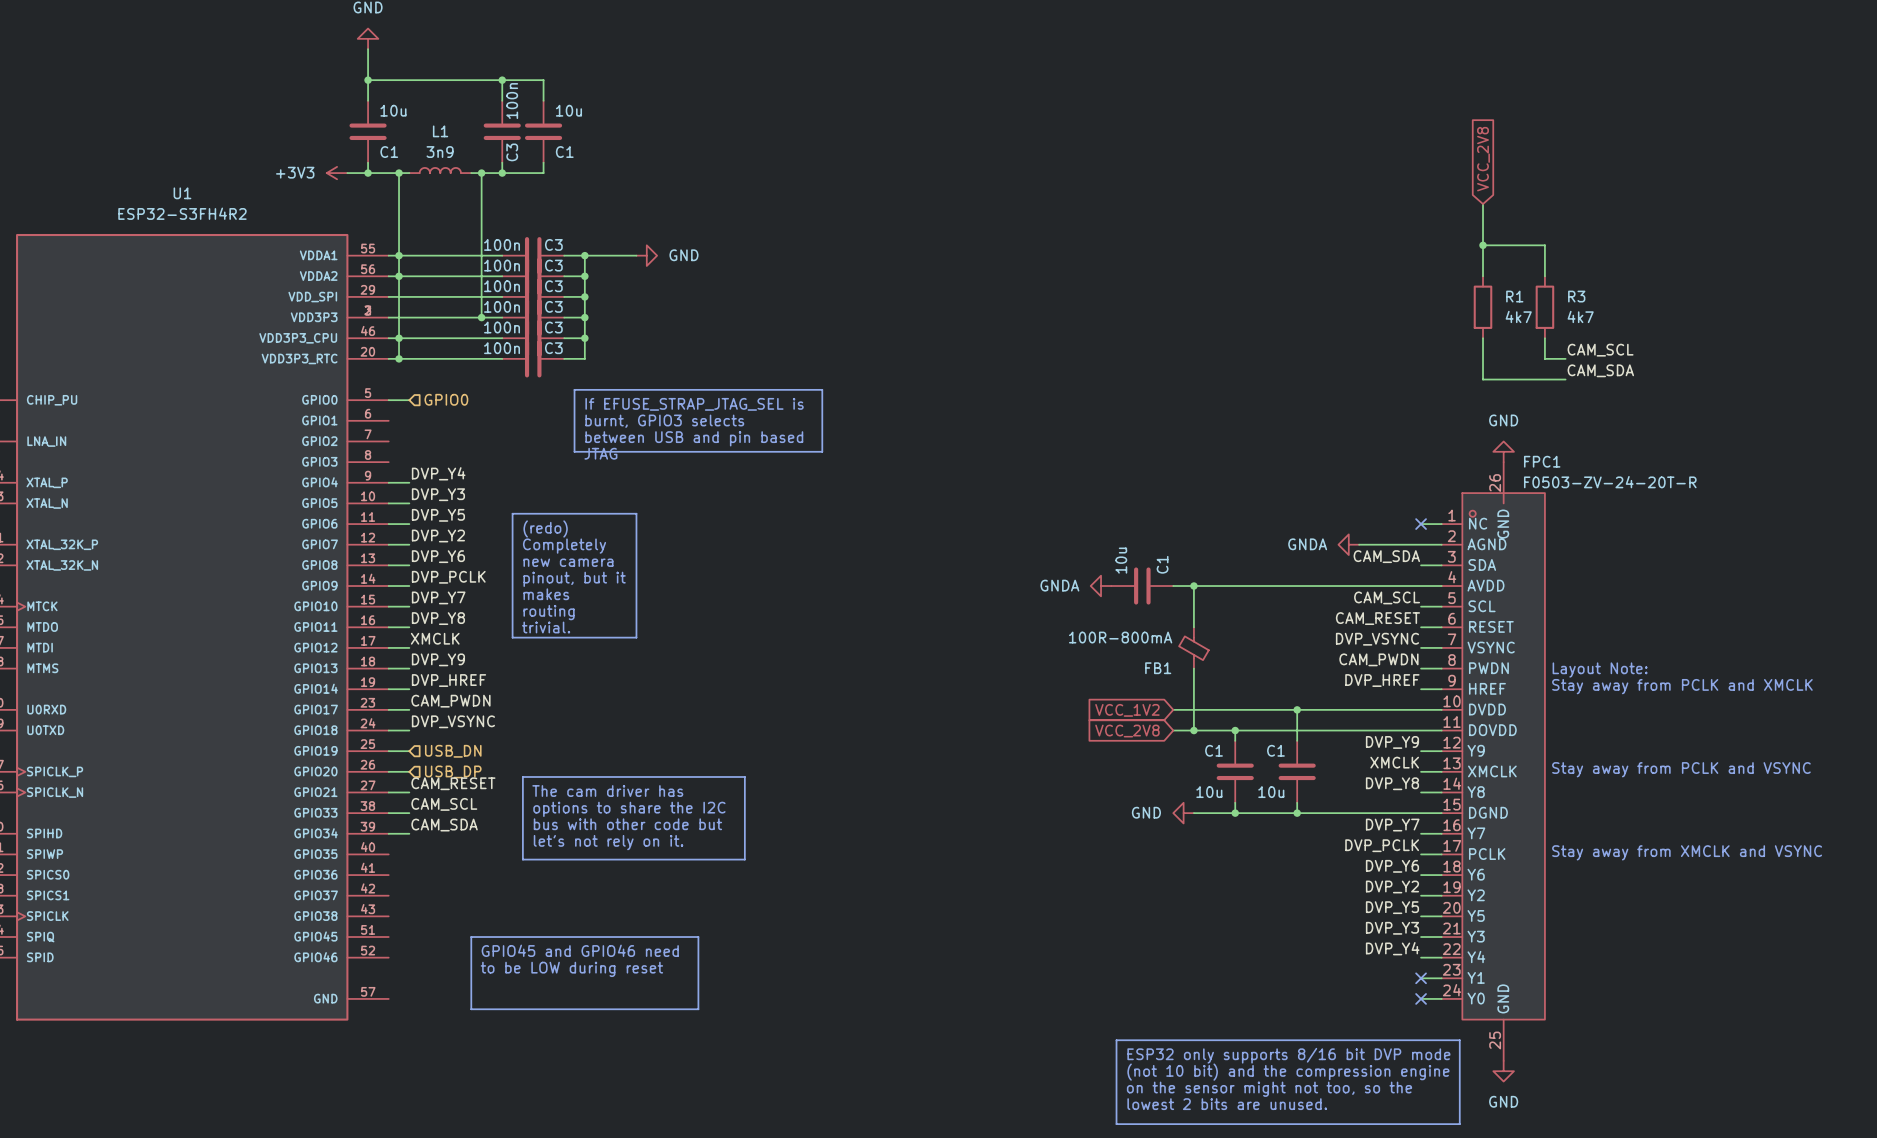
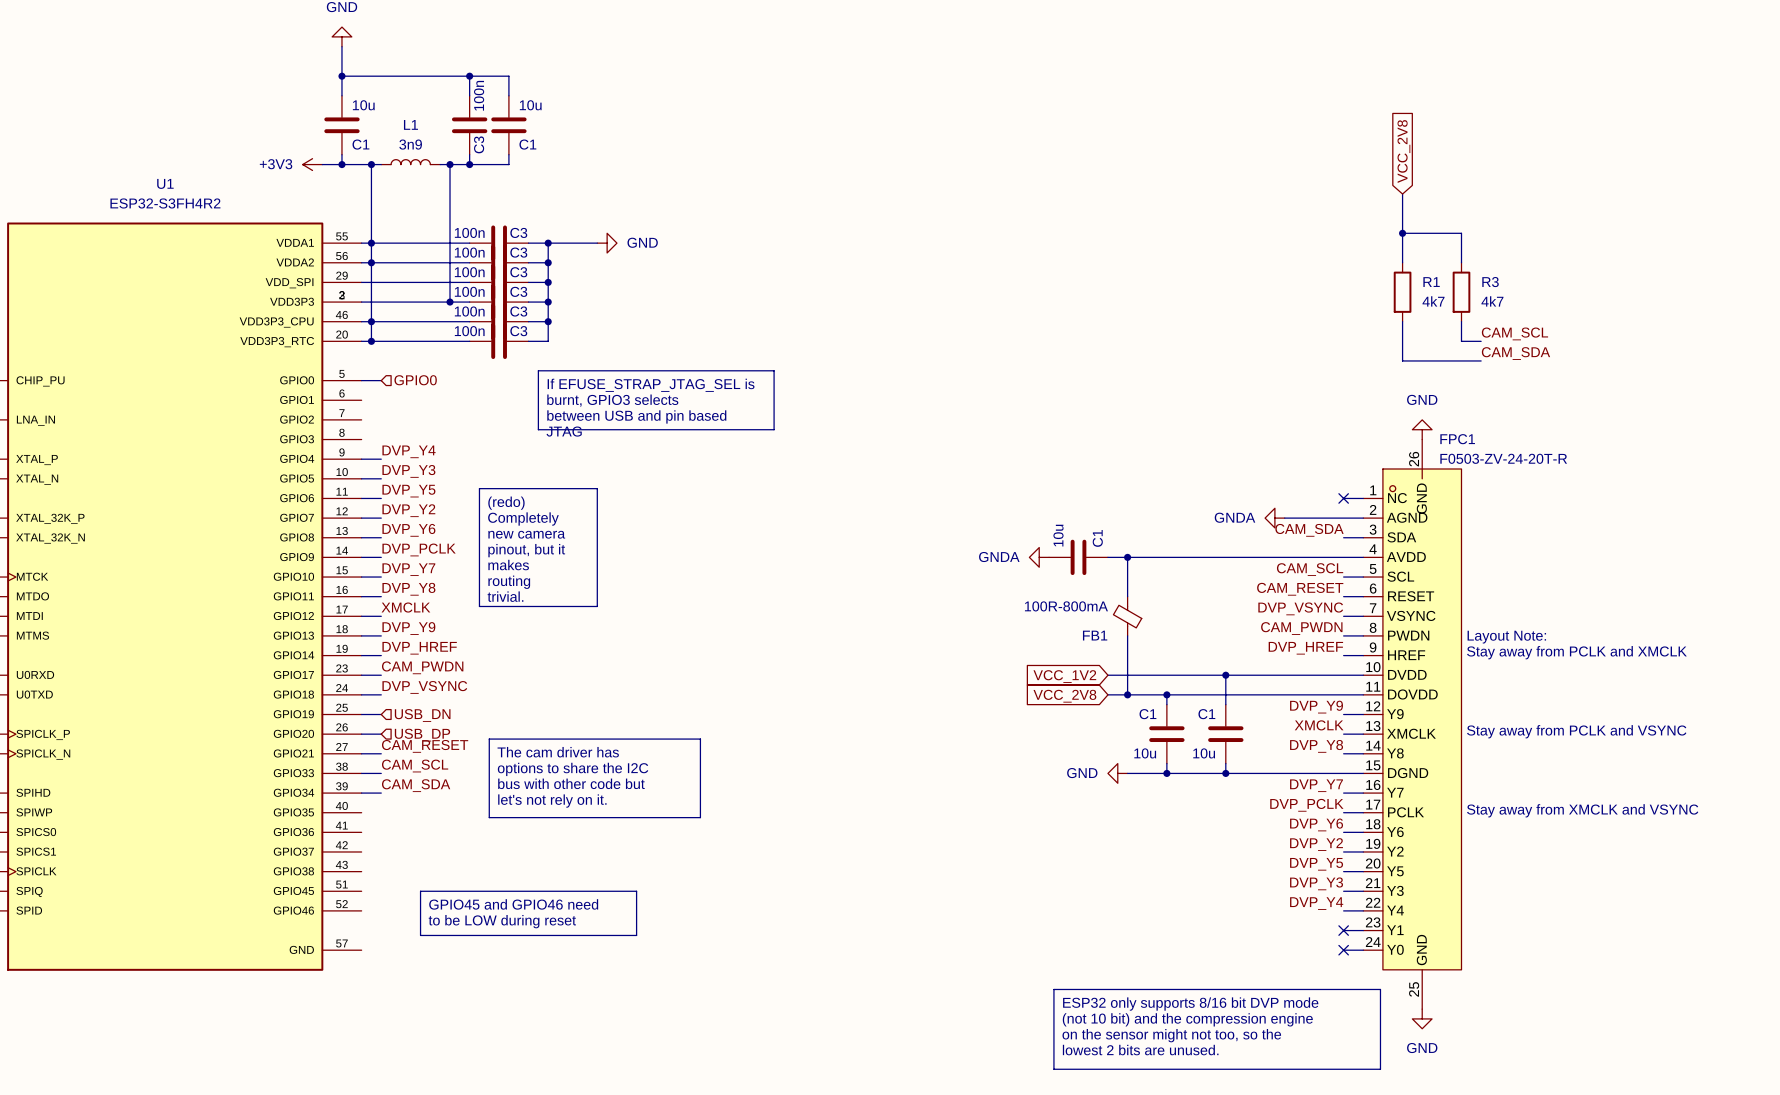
line: (471, 937) (471, 1009) (698, 1009) (698, 937) (677, 937) -> (440, 891) (420, 891) (420, 935) (636, 935) (636, 891)
text position: GPIO45 and GPIO46 need (580, 950) -> GPIO45 and GPIO46 need (513, 904)
text position: to be LOW during reset (571, 969) -> to be LOW during reset (502, 921)

